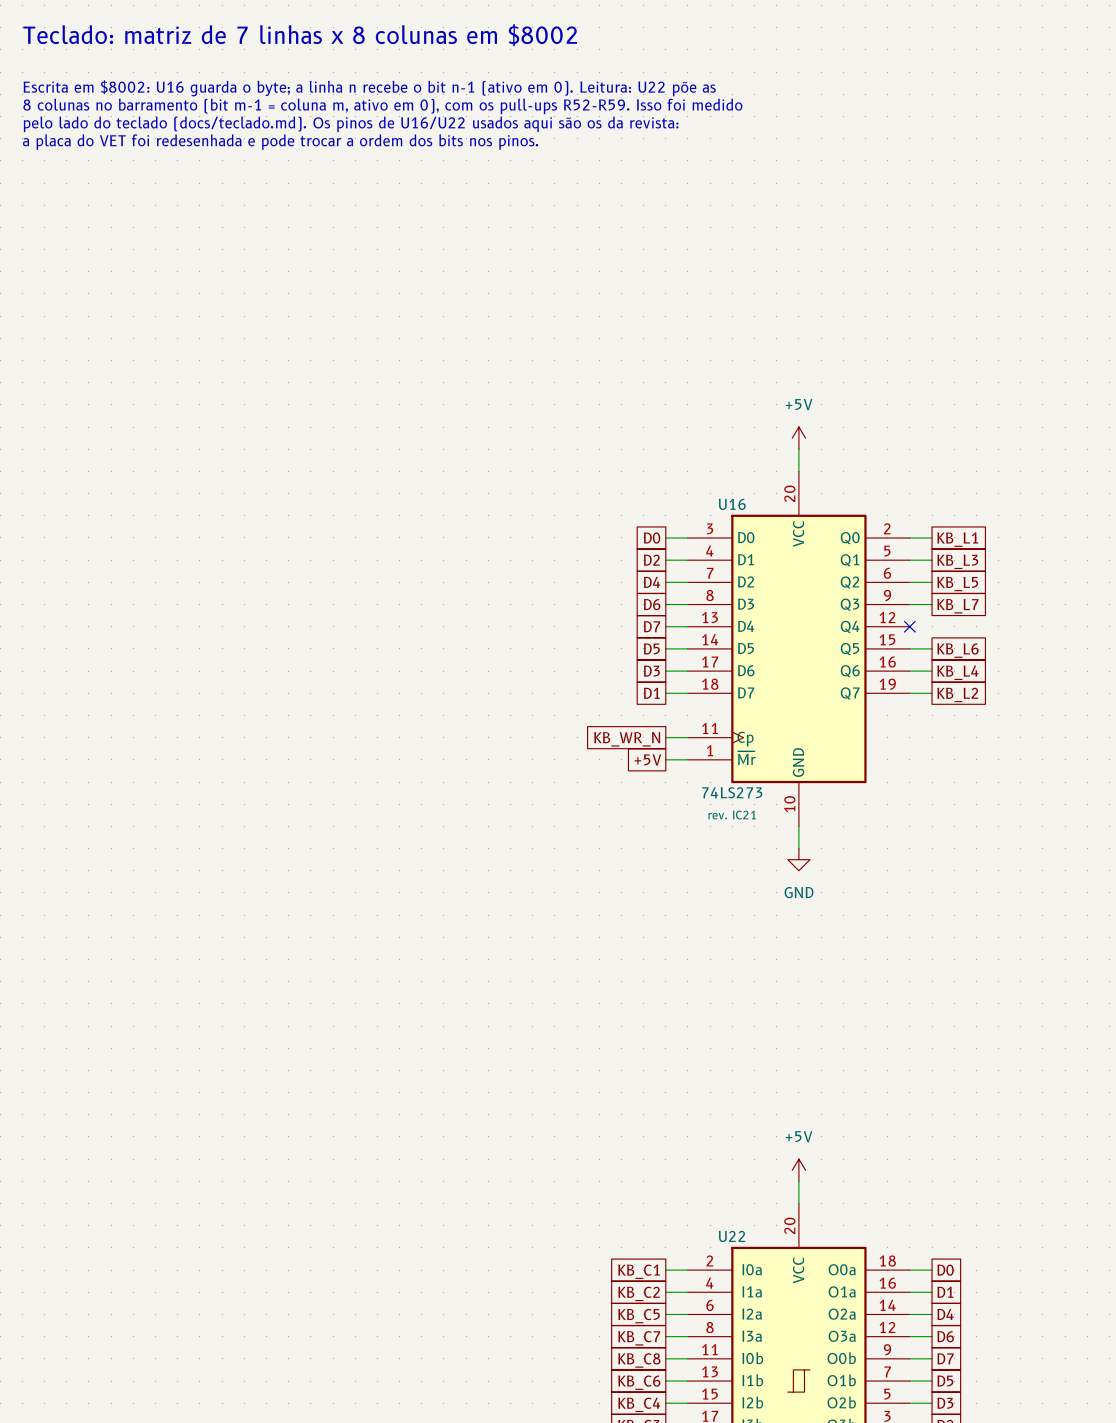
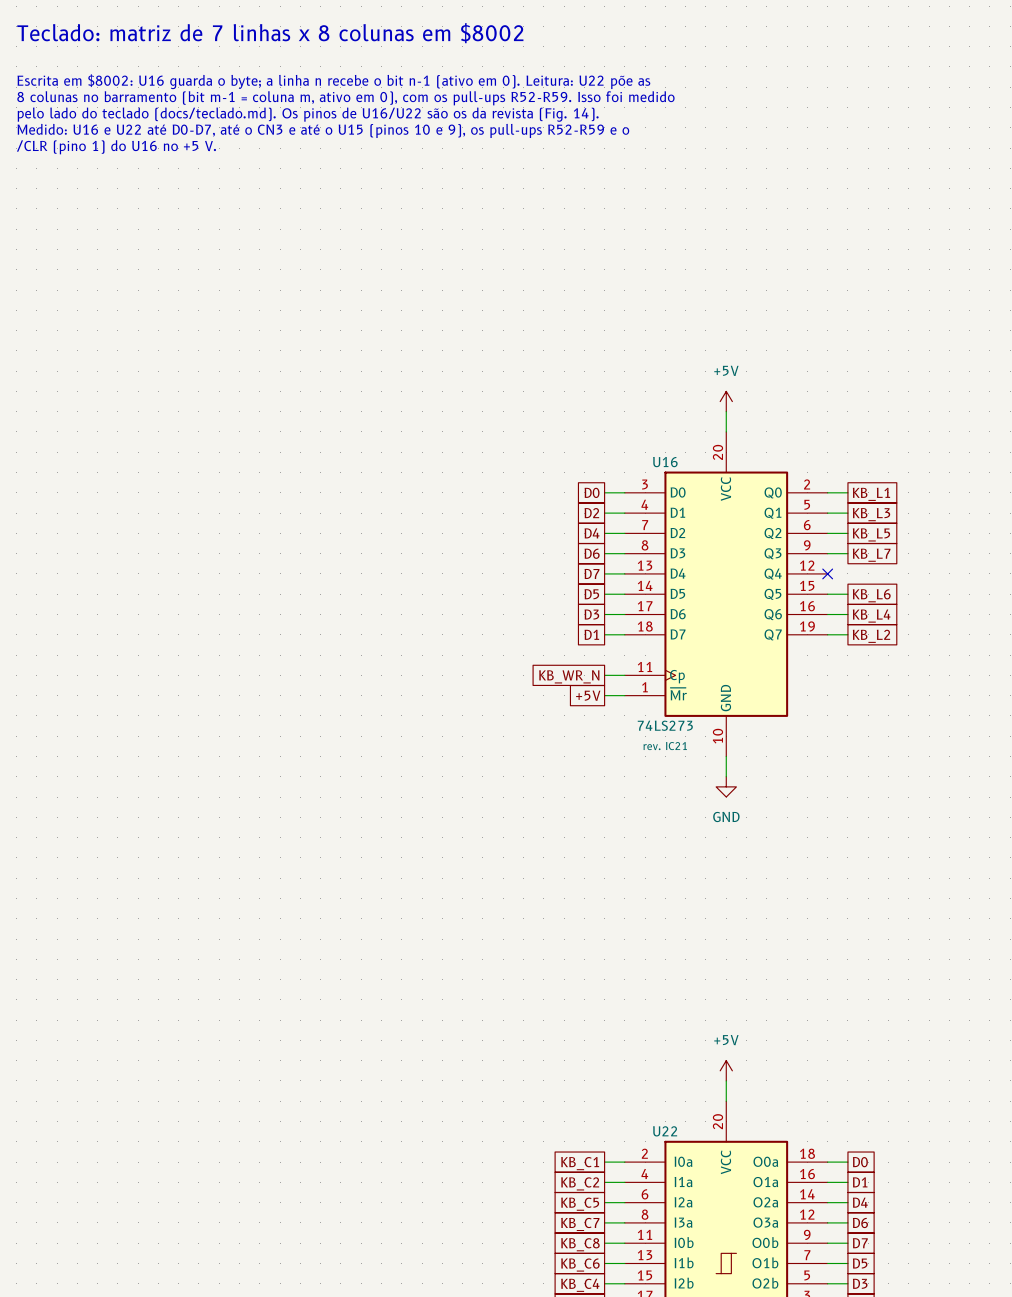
text: pelo lado do teclado (docs/teclado.md). Os pinos de U16/U22 usados aqui são os da revista: (351, 124) -> pelo lado do teclado (docs/teclado.md). Os pinos de U16/U22 são os da revista (Fig. 14). (308, 114)
text: a placa do VET foi redesenhada e pode trocar a ordem dos bits nos pinos. (280, 142) -> Medido: U16 e U22 até D0-D7, até o CN3 e até o U15 (pinos 10 e 9), os pull-ups R52-R59 e o (323, 130)
text: none -> /CLR (pino 1) do U16 no +5 V. (116, 147)

